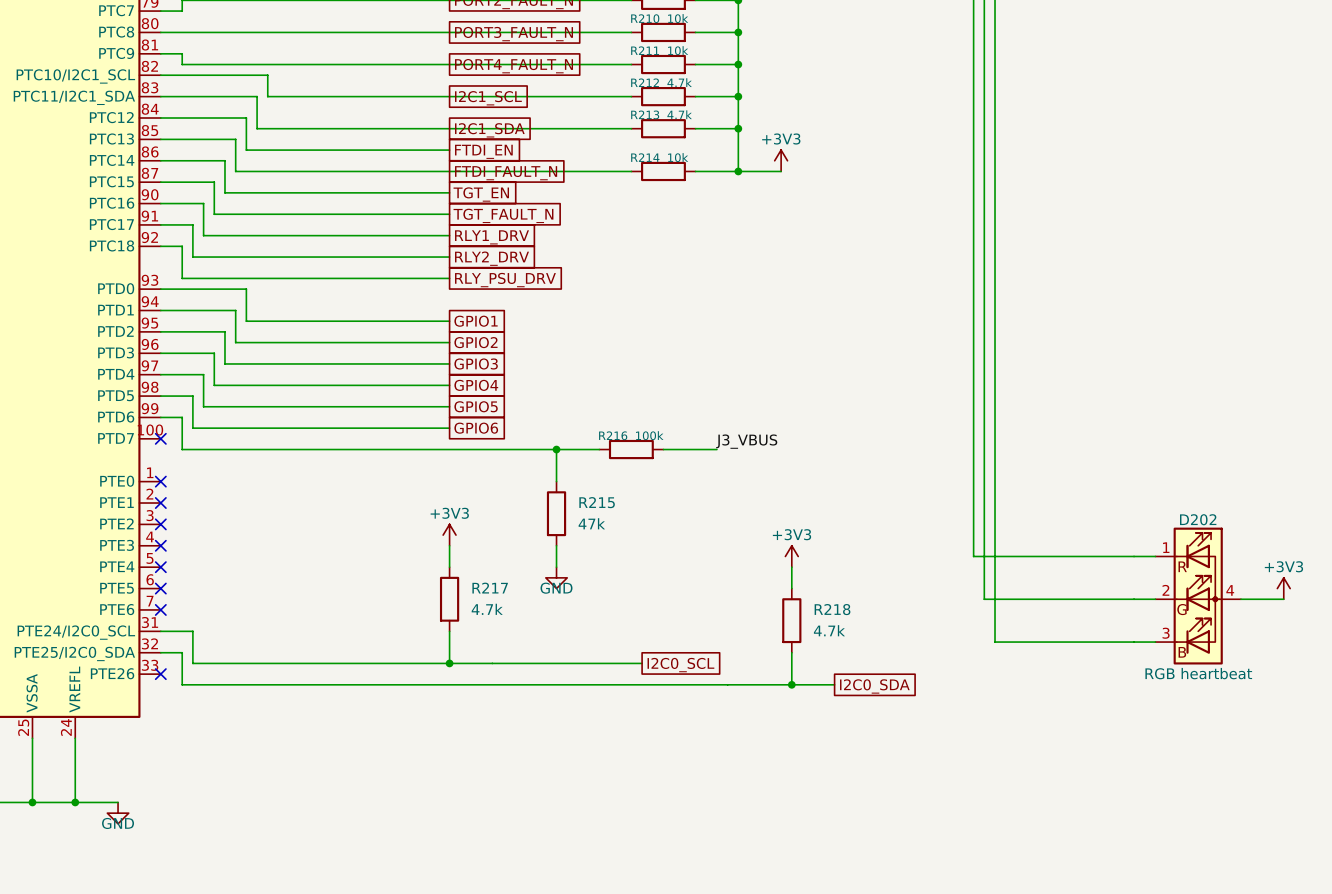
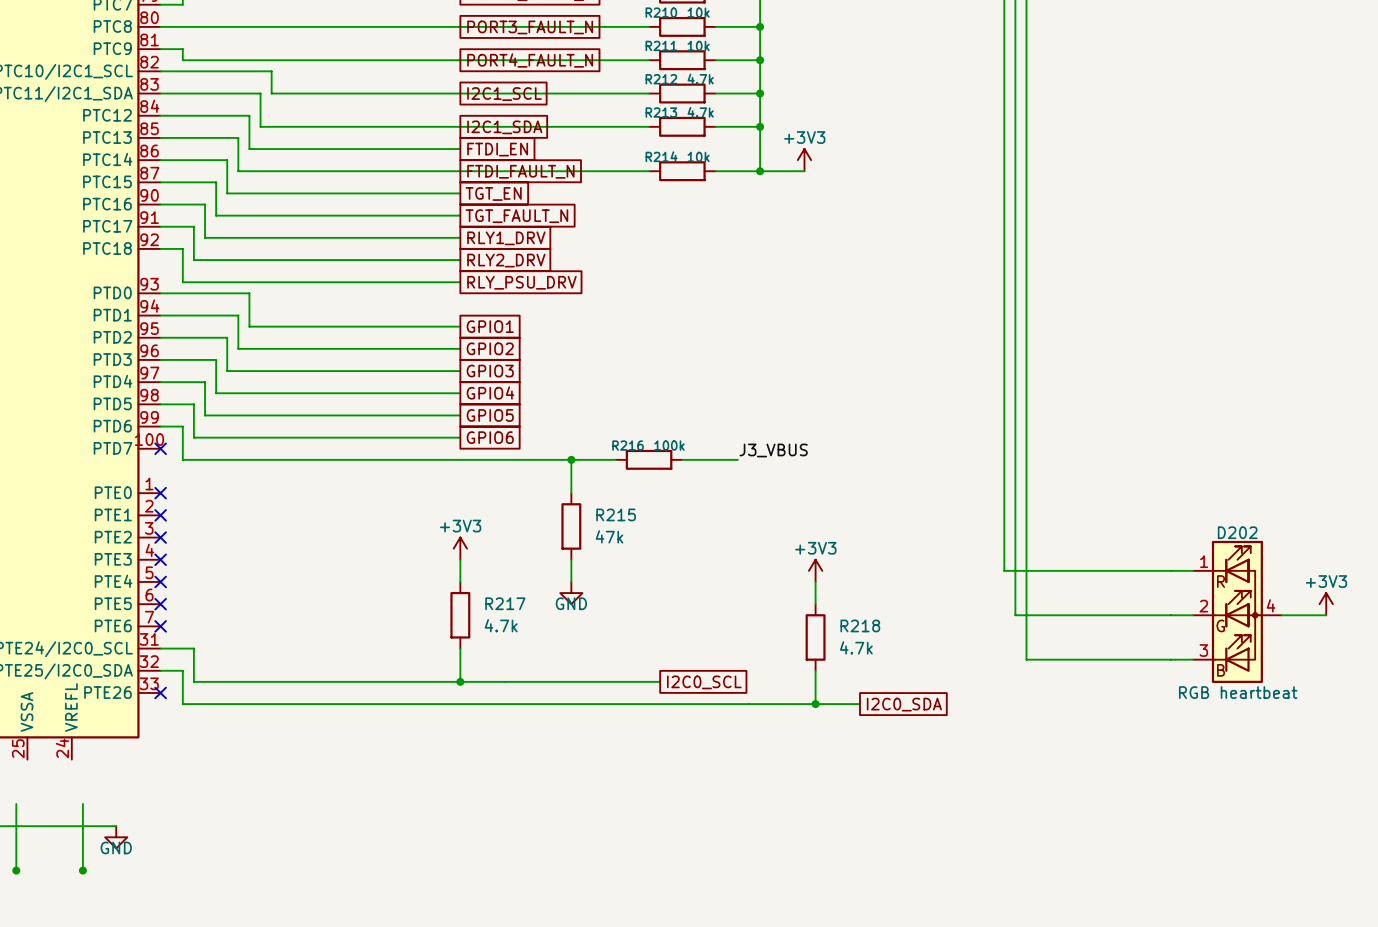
wire: (32, 738) (32, 802) -> (16, 803) (16, 870)
wire: (75, 738) (75, 802) -> (82, 803) (82, 870)
junction: (32, 802) -> none
junction: (75, 802) -> none
junction: none -> (16, 870)
junction: none -> (82, 870)

